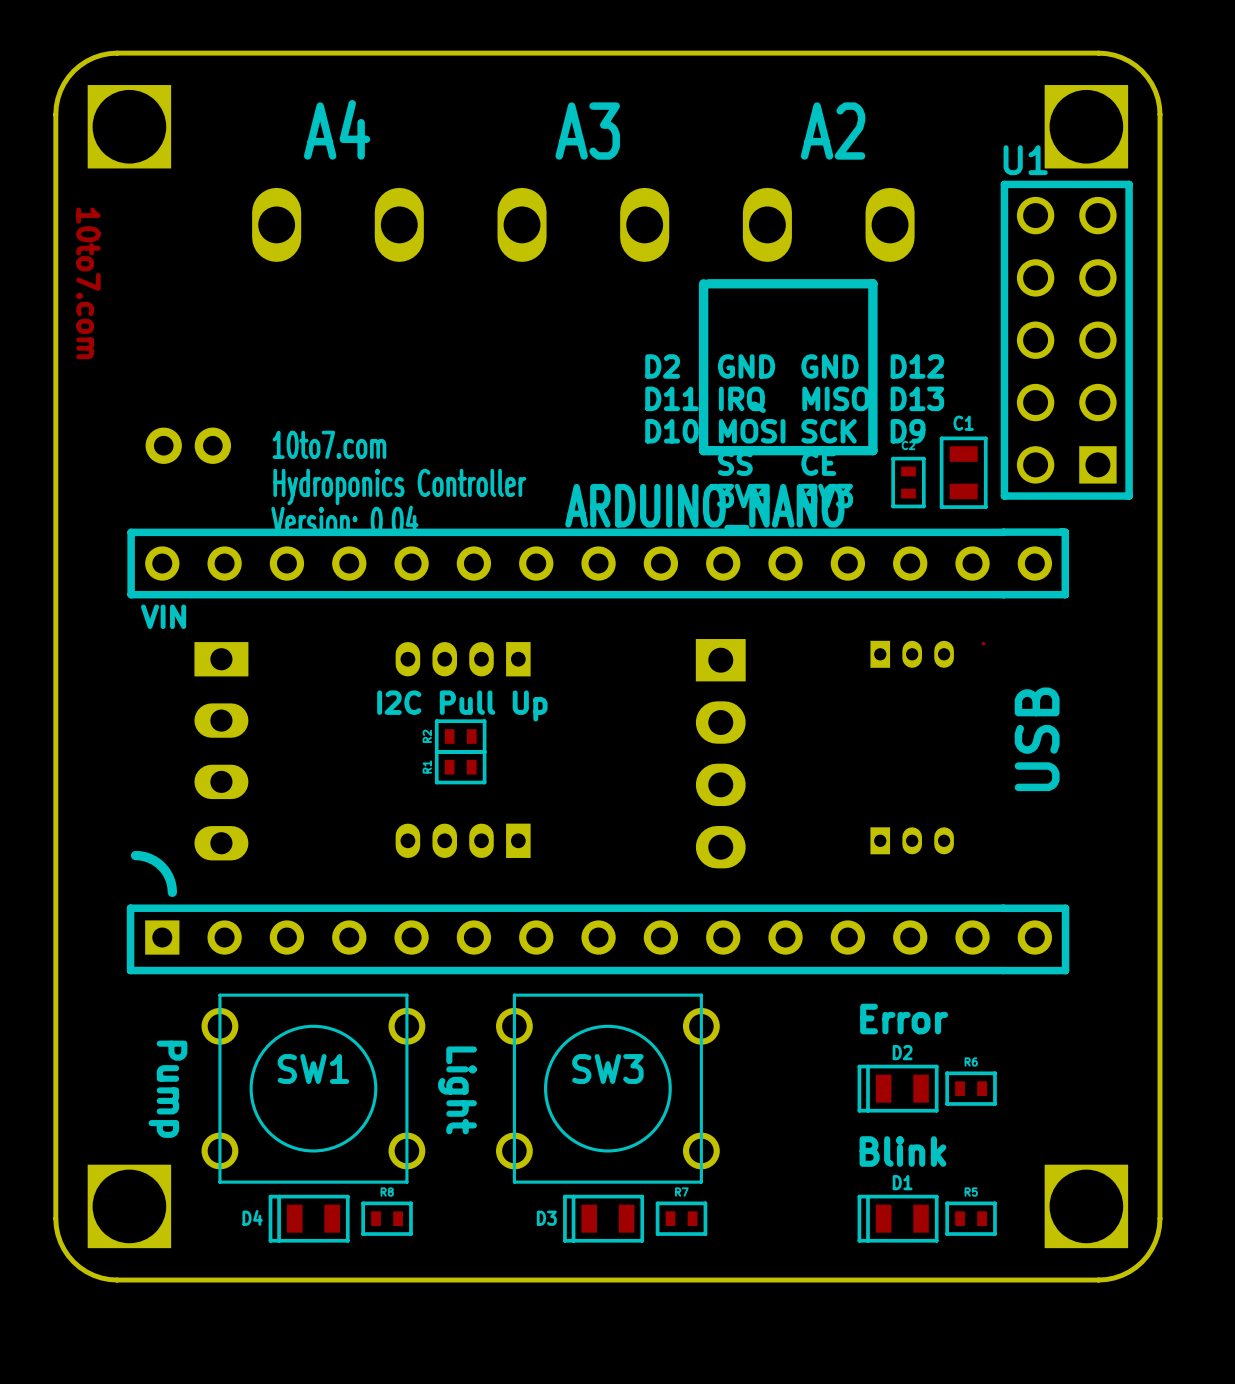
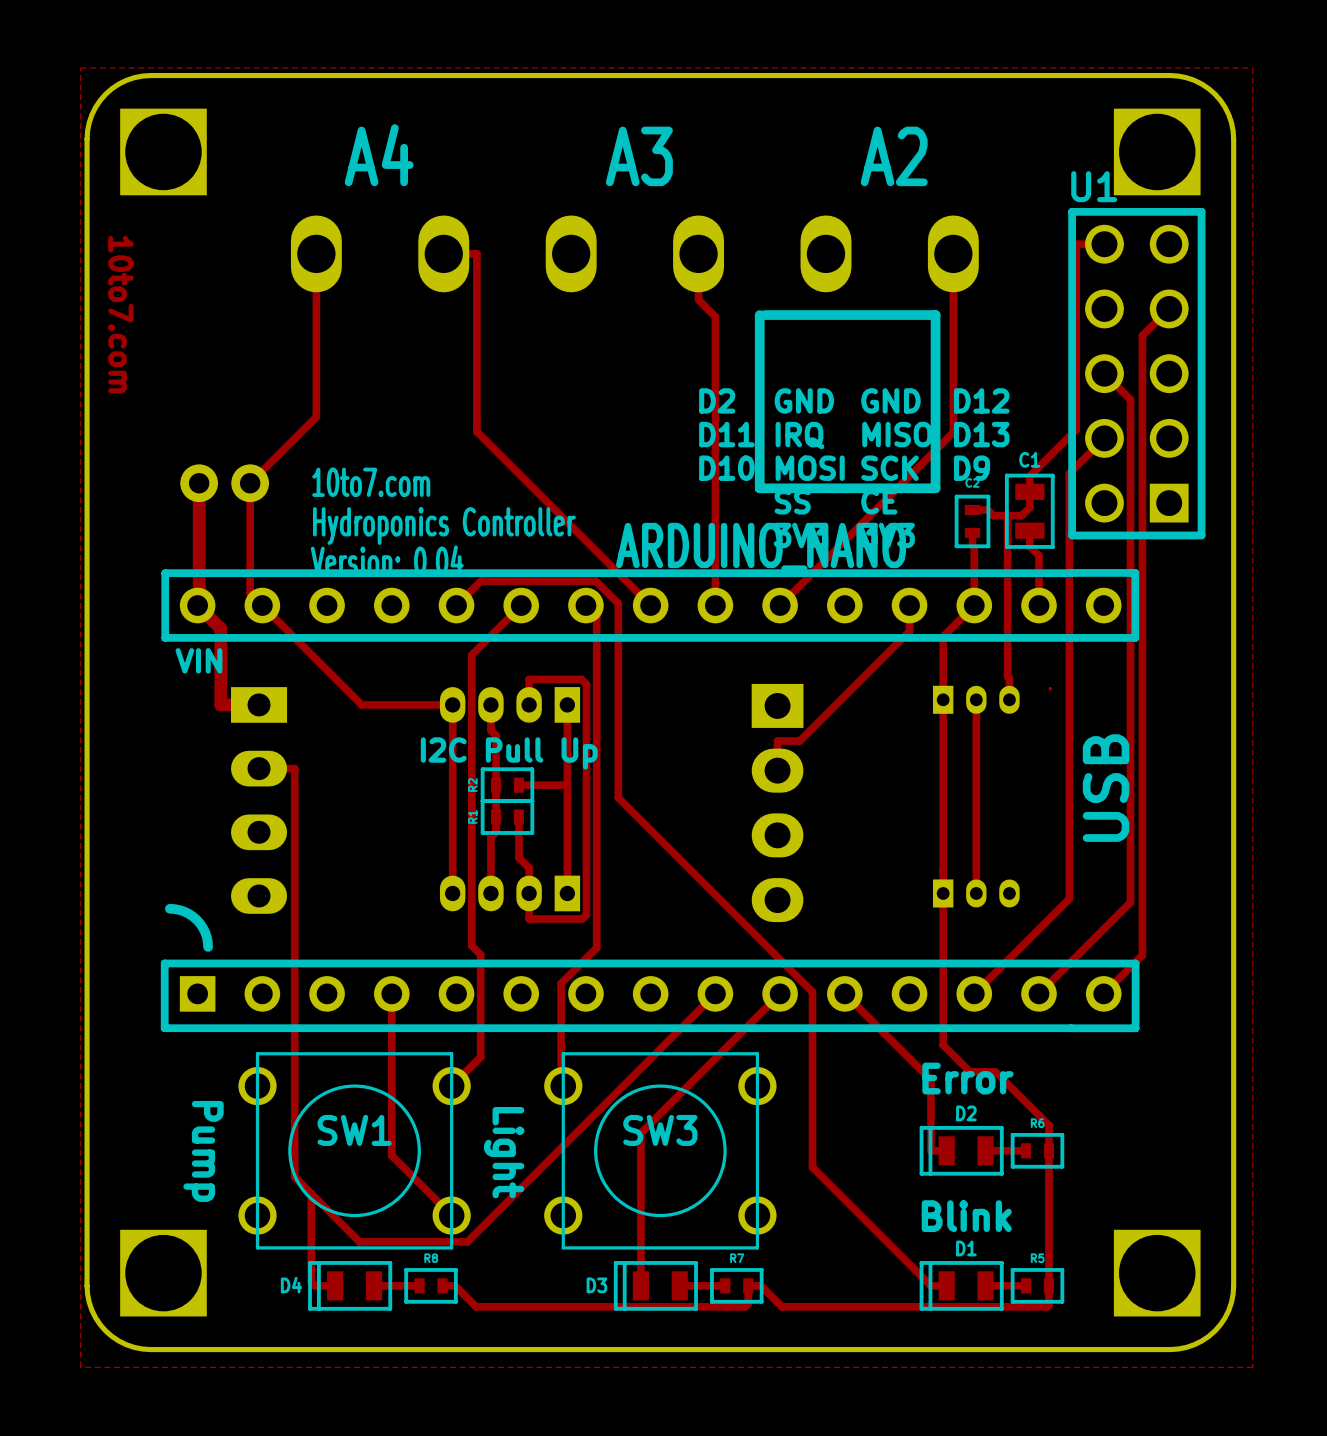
zone outline: none -> (80, 67) (1252, 67) (1252, 1367) (80, 1367) (80, 67)
track: none -> (1104, 244) (1076, 244) (1076, 429) (1029, 476) (1029, 507) (1021, 515) (993, 515) (987, 509) (972, 509)
track: none -> (316, 253) (316, 416) (250, 483) (250, 593) (361, 704) (452, 704) (452, 893)
track: none -> (443, 253) (476, 253) (476, 431) (650, 605)
track: none -> (698, 253) (698, 299) (715, 316) (715, 605)
track: none -> (953, 253) (953, 432) (780, 605)
track: none -> (1169, 308) (1142, 335) (1142, 955) (1103, 993)
track: none -> (1104, 373) (1130, 399) (1130, 902) (1039, 993)
track: none -> (1104, 438) (1069, 473) (1069, 898) (974, 993)
track: none -> (199, 483) (197, 605) (220, 628) (220, 704) (259, 704)
track: none -> (1007, 515) (1007, 676) (1009, 678) (1009, 699)
track: none -> (1029, 530) (1029, 546) (1039, 555) (1039, 605)
track: none -> (972, 532) (974, 605) (943, 636) (943, 1045) (969, 1071) (995, 1071) (1048, 1125) (1048, 1304) (1047, 1306) (781, 1306) (760, 1285) (748, 1285) (748, 1303) (745, 1306) (476, 1306) (455, 1285) (442, 1285)
track: none -> (456, 605) (480, 581) (595, 581) (618, 603) (618, 797) (812, 991) (812, 1167) (930, 1285) (946, 1285)
track: none -> (521, 605) (471, 654) (471, 945) (480, 954) (480, 1057) (451, 1086)
track: none -> (585, 605) (596, 616) (596, 947) (561, 983) (561, 1083) (563, 1086)
track: none -> (909, 605) (909, 631) (799, 741) (777, 741) (777, 770)
track: none -> (976, 699) (976, 893)
track: none -> (490, 704) (490, 730) (496, 735) (496, 832) (490, 837) (490, 893)
track: none -> (529, 704) (529, 679) (581, 679) (586, 684) (586, 914) (582, 918) (529, 918) (529, 867) (518, 857) (518, 817)
track: none -> (567, 704) (567, 893)
track: none -> (259, 768) (294, 768) (294, 1177) (359, 1241) (467, 1241) (715, 993)
track: none -> (518, 785) (567, 785)
track: none -> (391, 993) (391, 1155) (451, 1215)
track: none -> (780, 993) (640, 1133) (640, 1285)
track: none -> (844, 993) (930, 1080) (930, 1150) (946, 1150)
track: none -> (985, 1150) (1026, 1150)
track: none -> (311, 1193) (311, 1282) (315, 1285) (335, 1285)
track: none -> (374, 1285) (419, 1285)
track: none -> (679, 1285) (725, 1285)
track: none -> (985, 1285) (1026, 1285)

